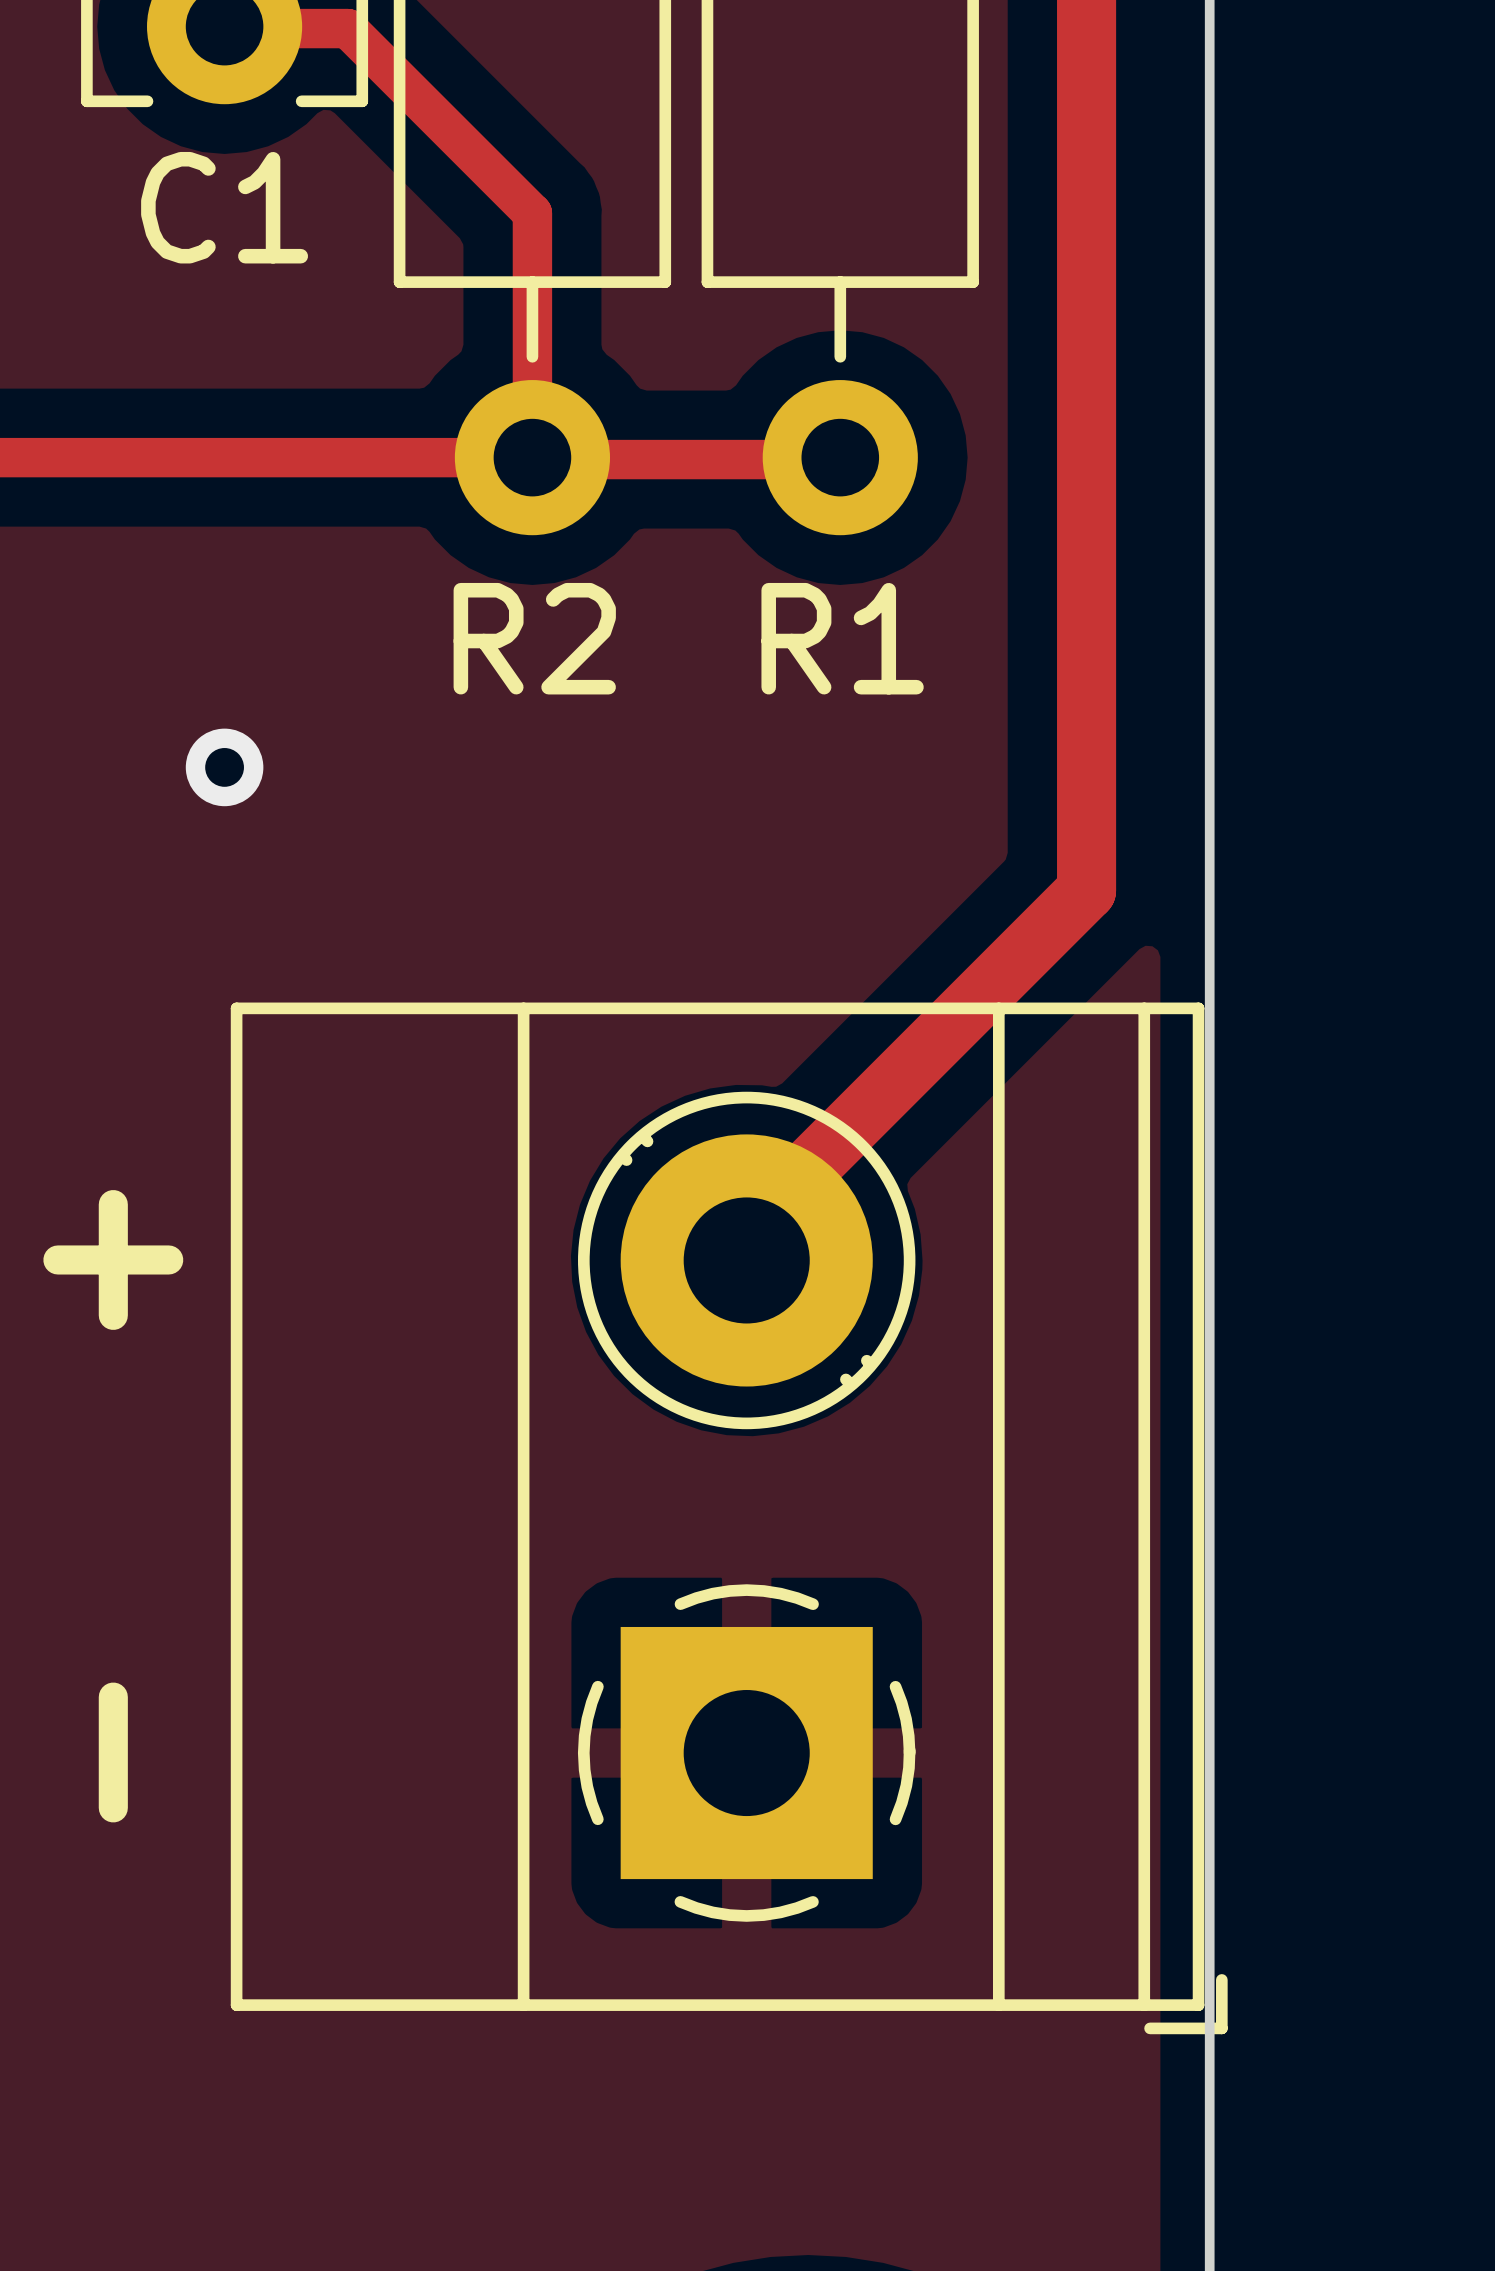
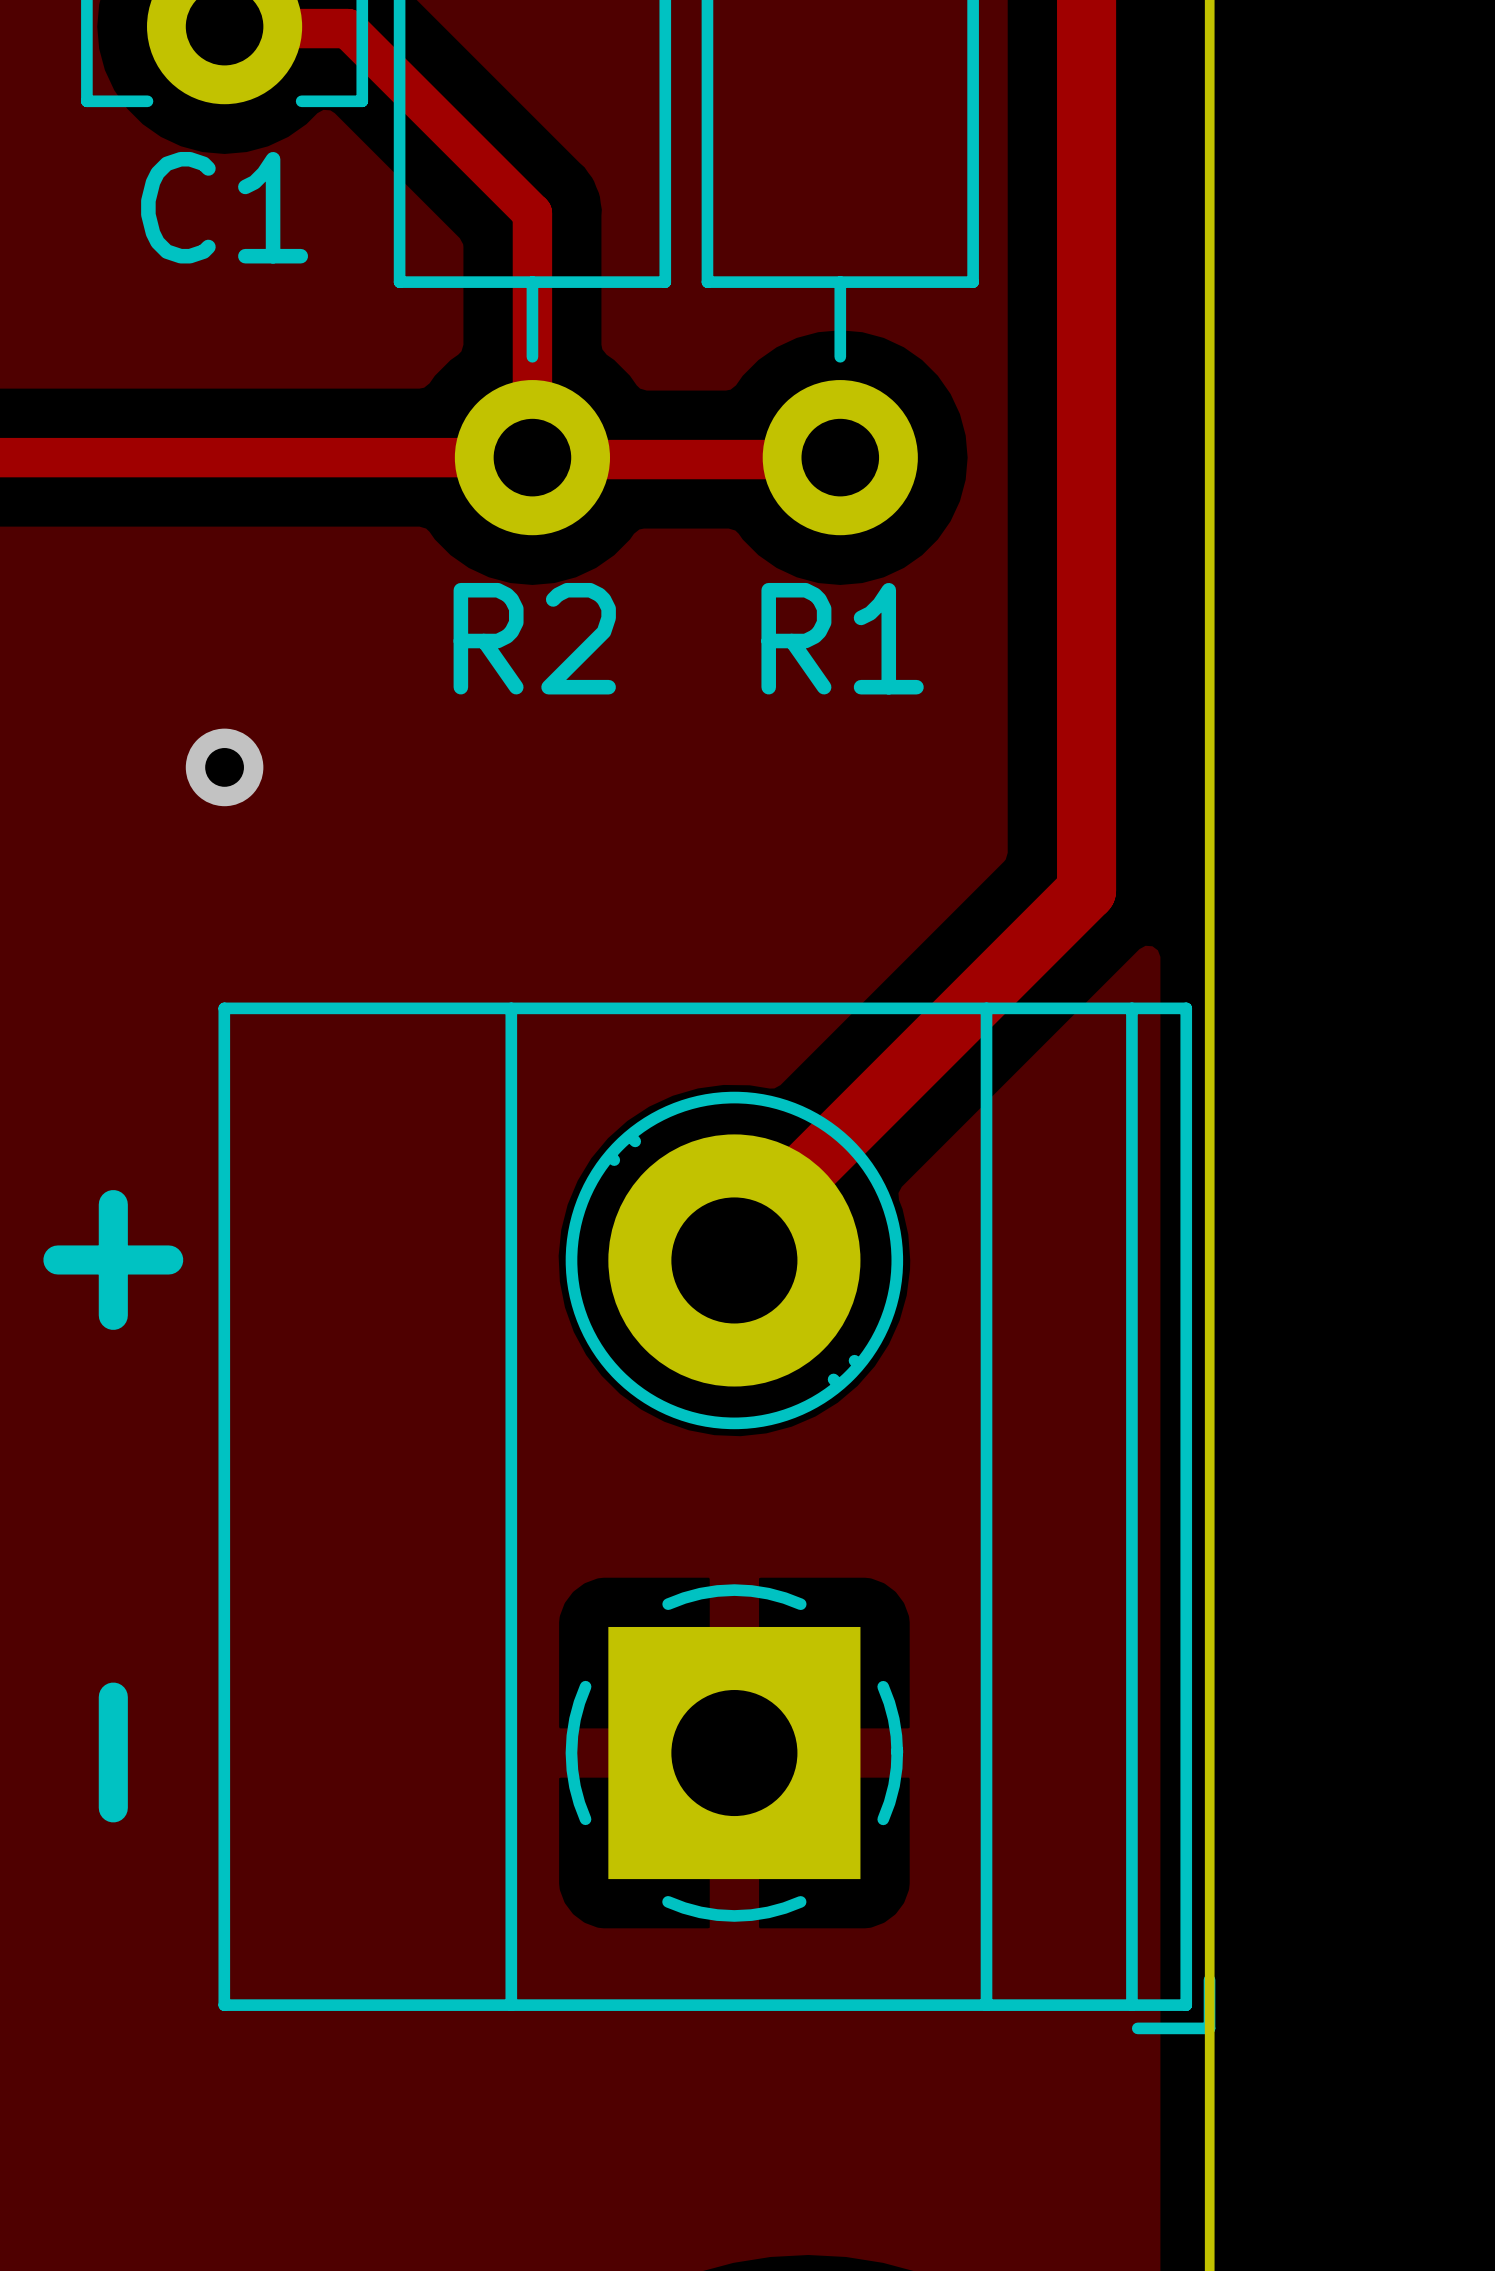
part position: (729, 1518) -> (716, 1518)

